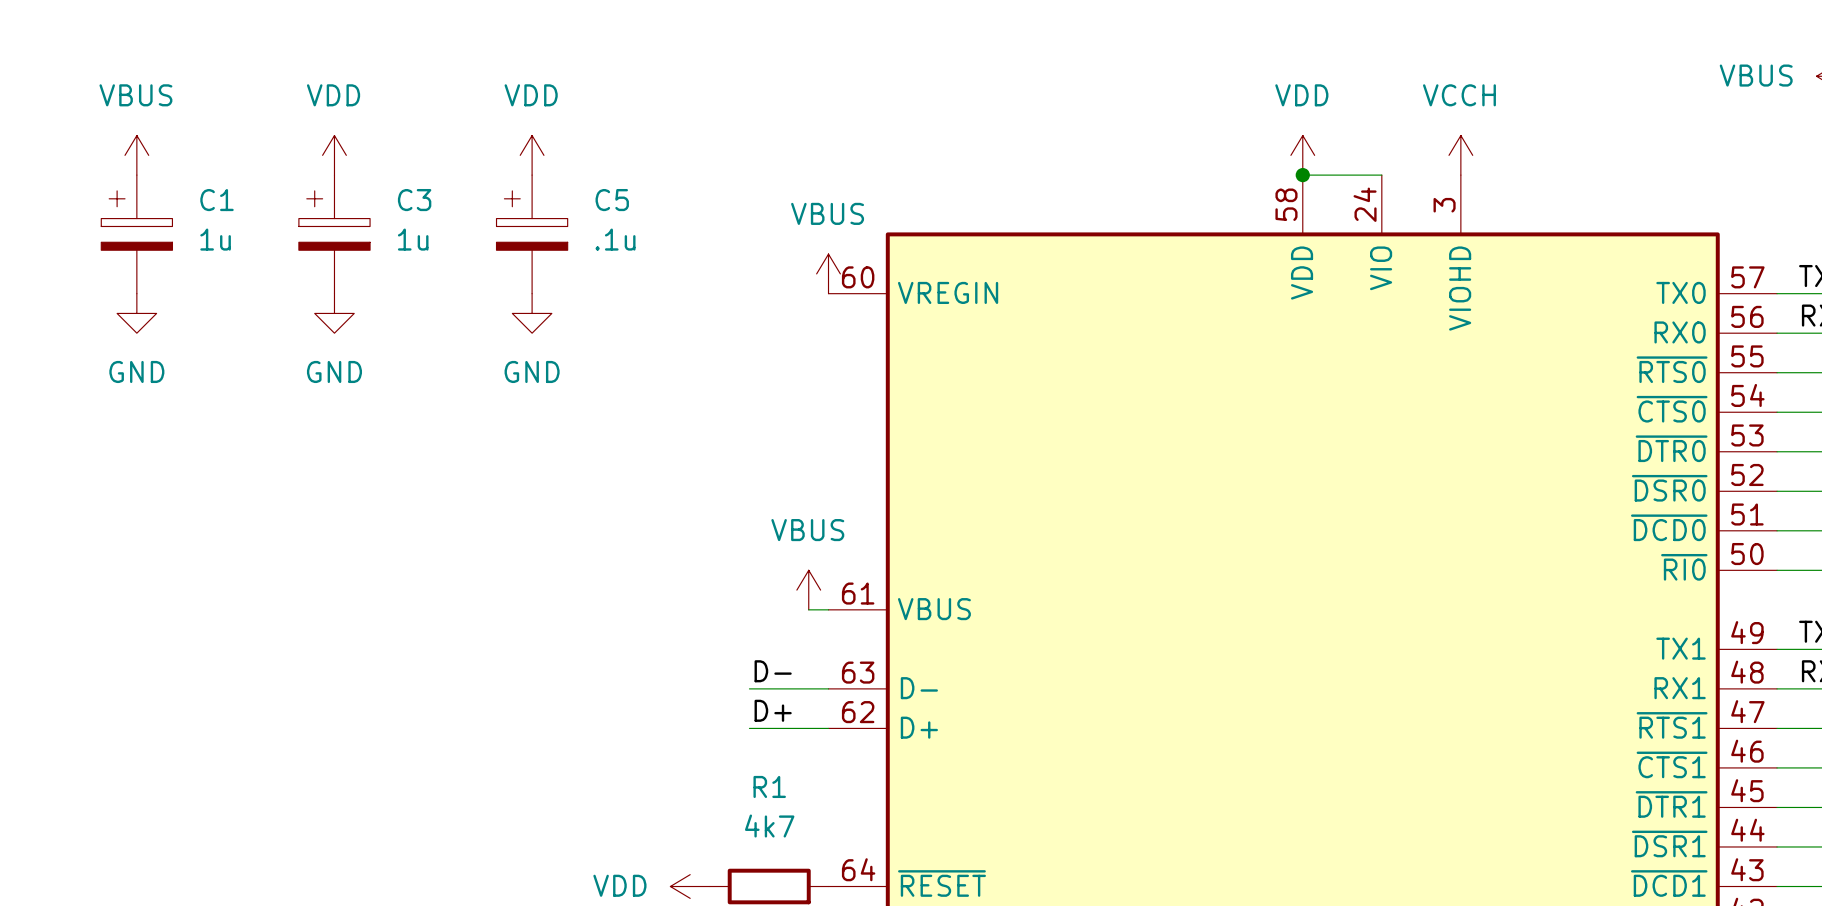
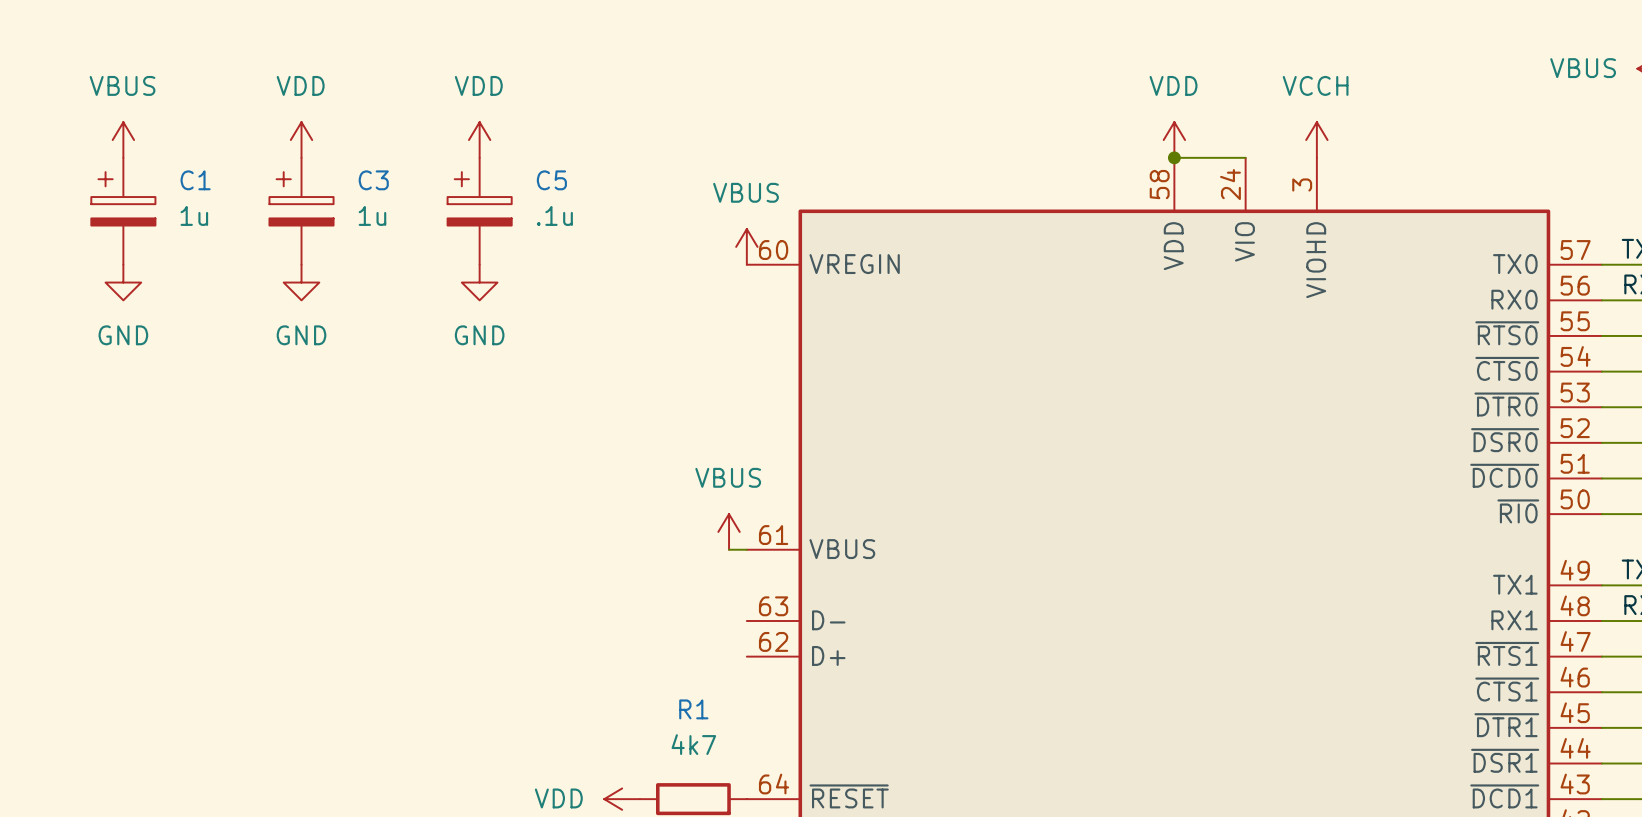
label: D- (773, 671) -> none
wire: (749, 688) (828, 688) -> none
label: D+ (773, 710) -> none
wire: (749, 728) (828, 728) -> none

